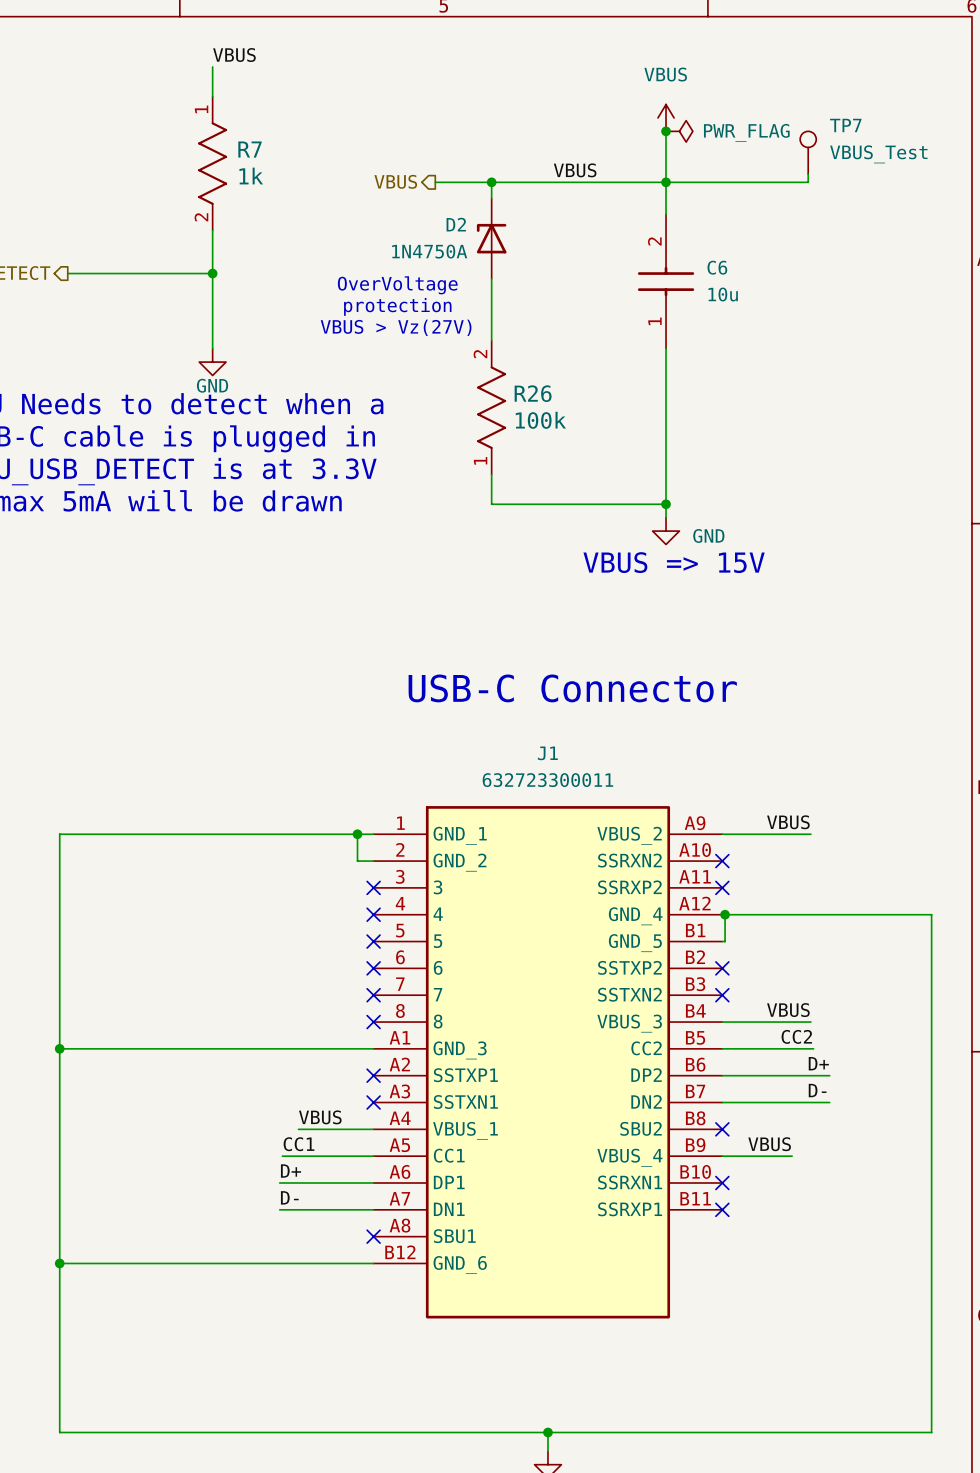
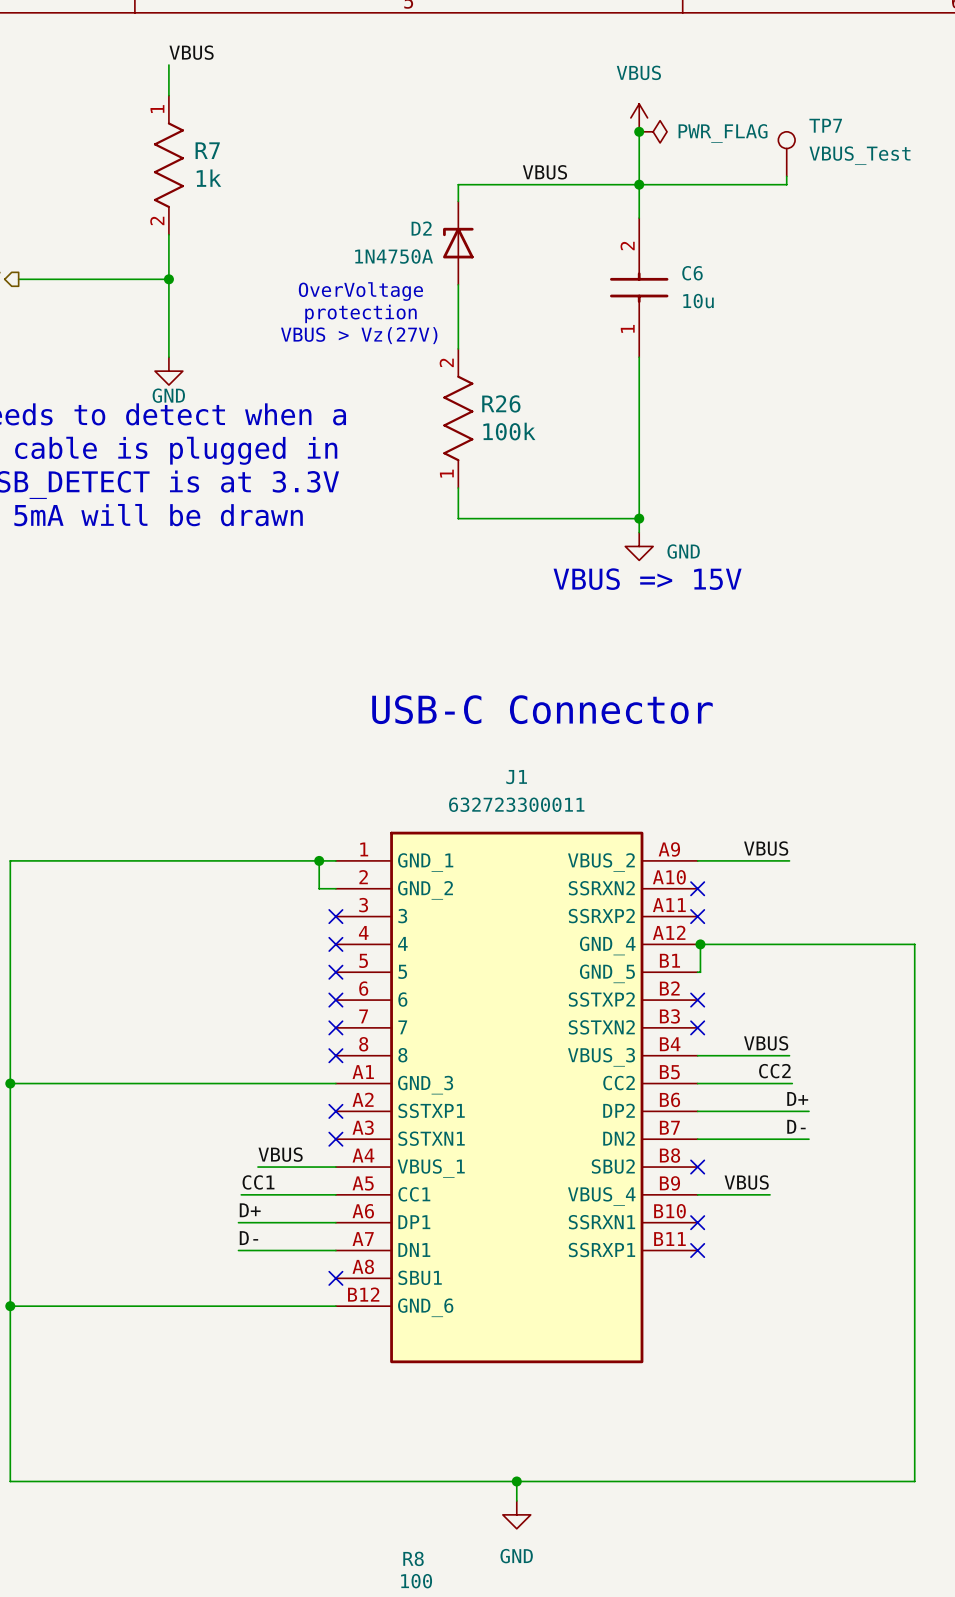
hierarchical label: VBUS (395, 181) -> none
wire: (435, 182) (491, 182) -> none
junction: (491, 182) -> none

